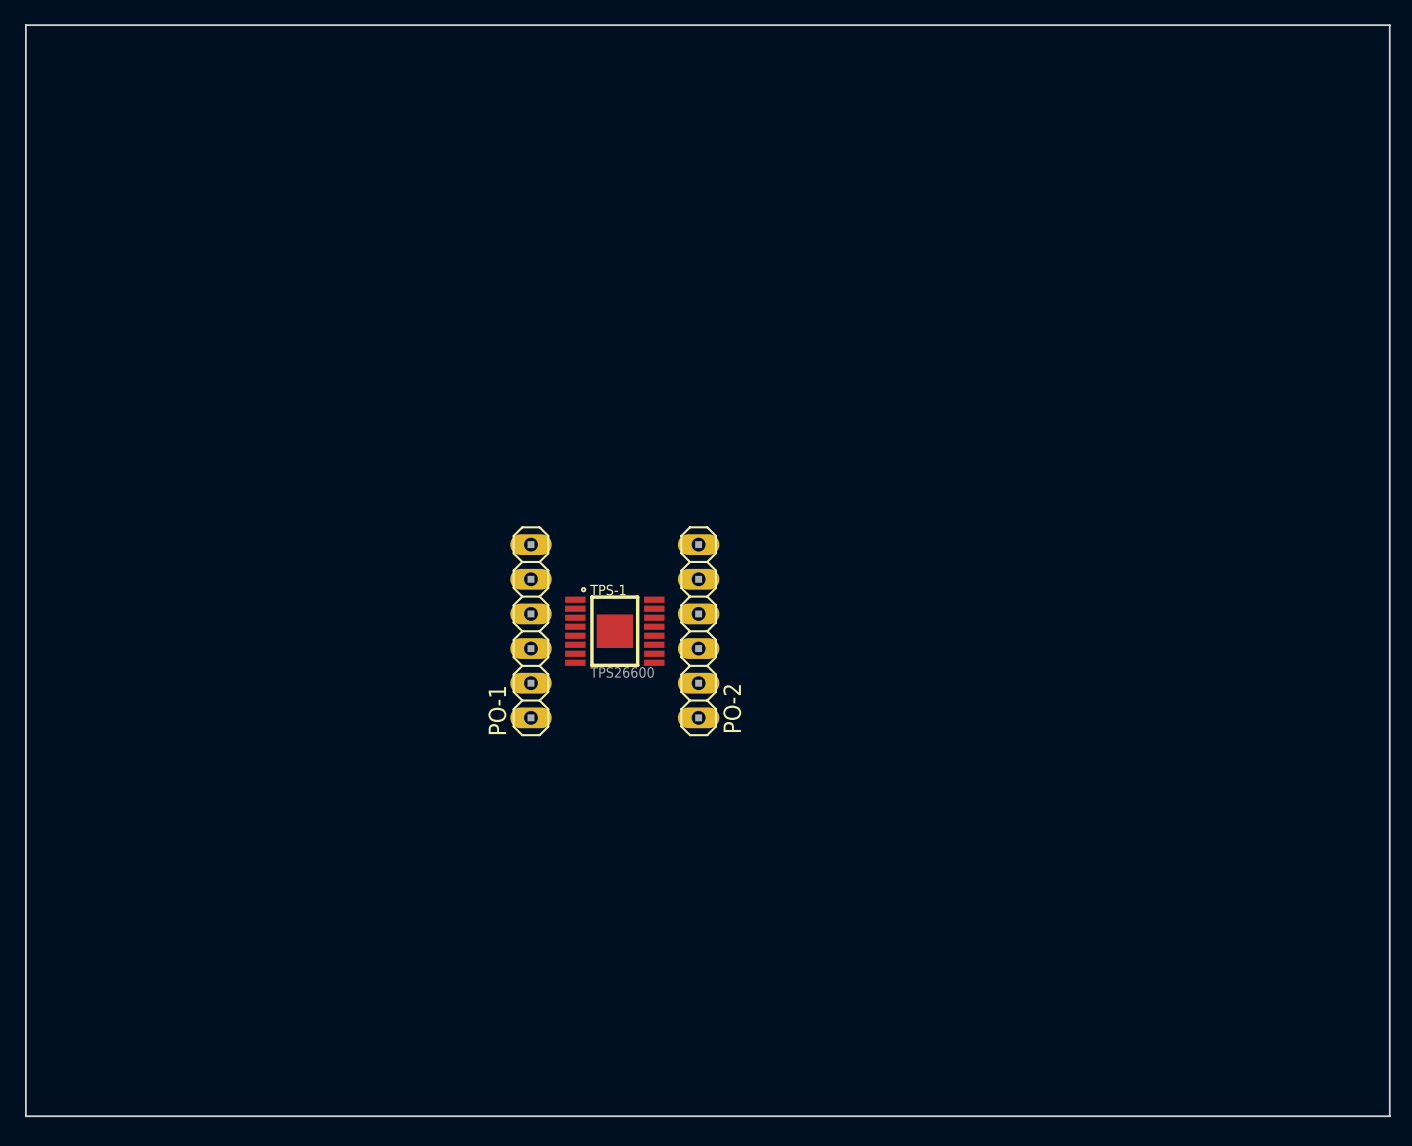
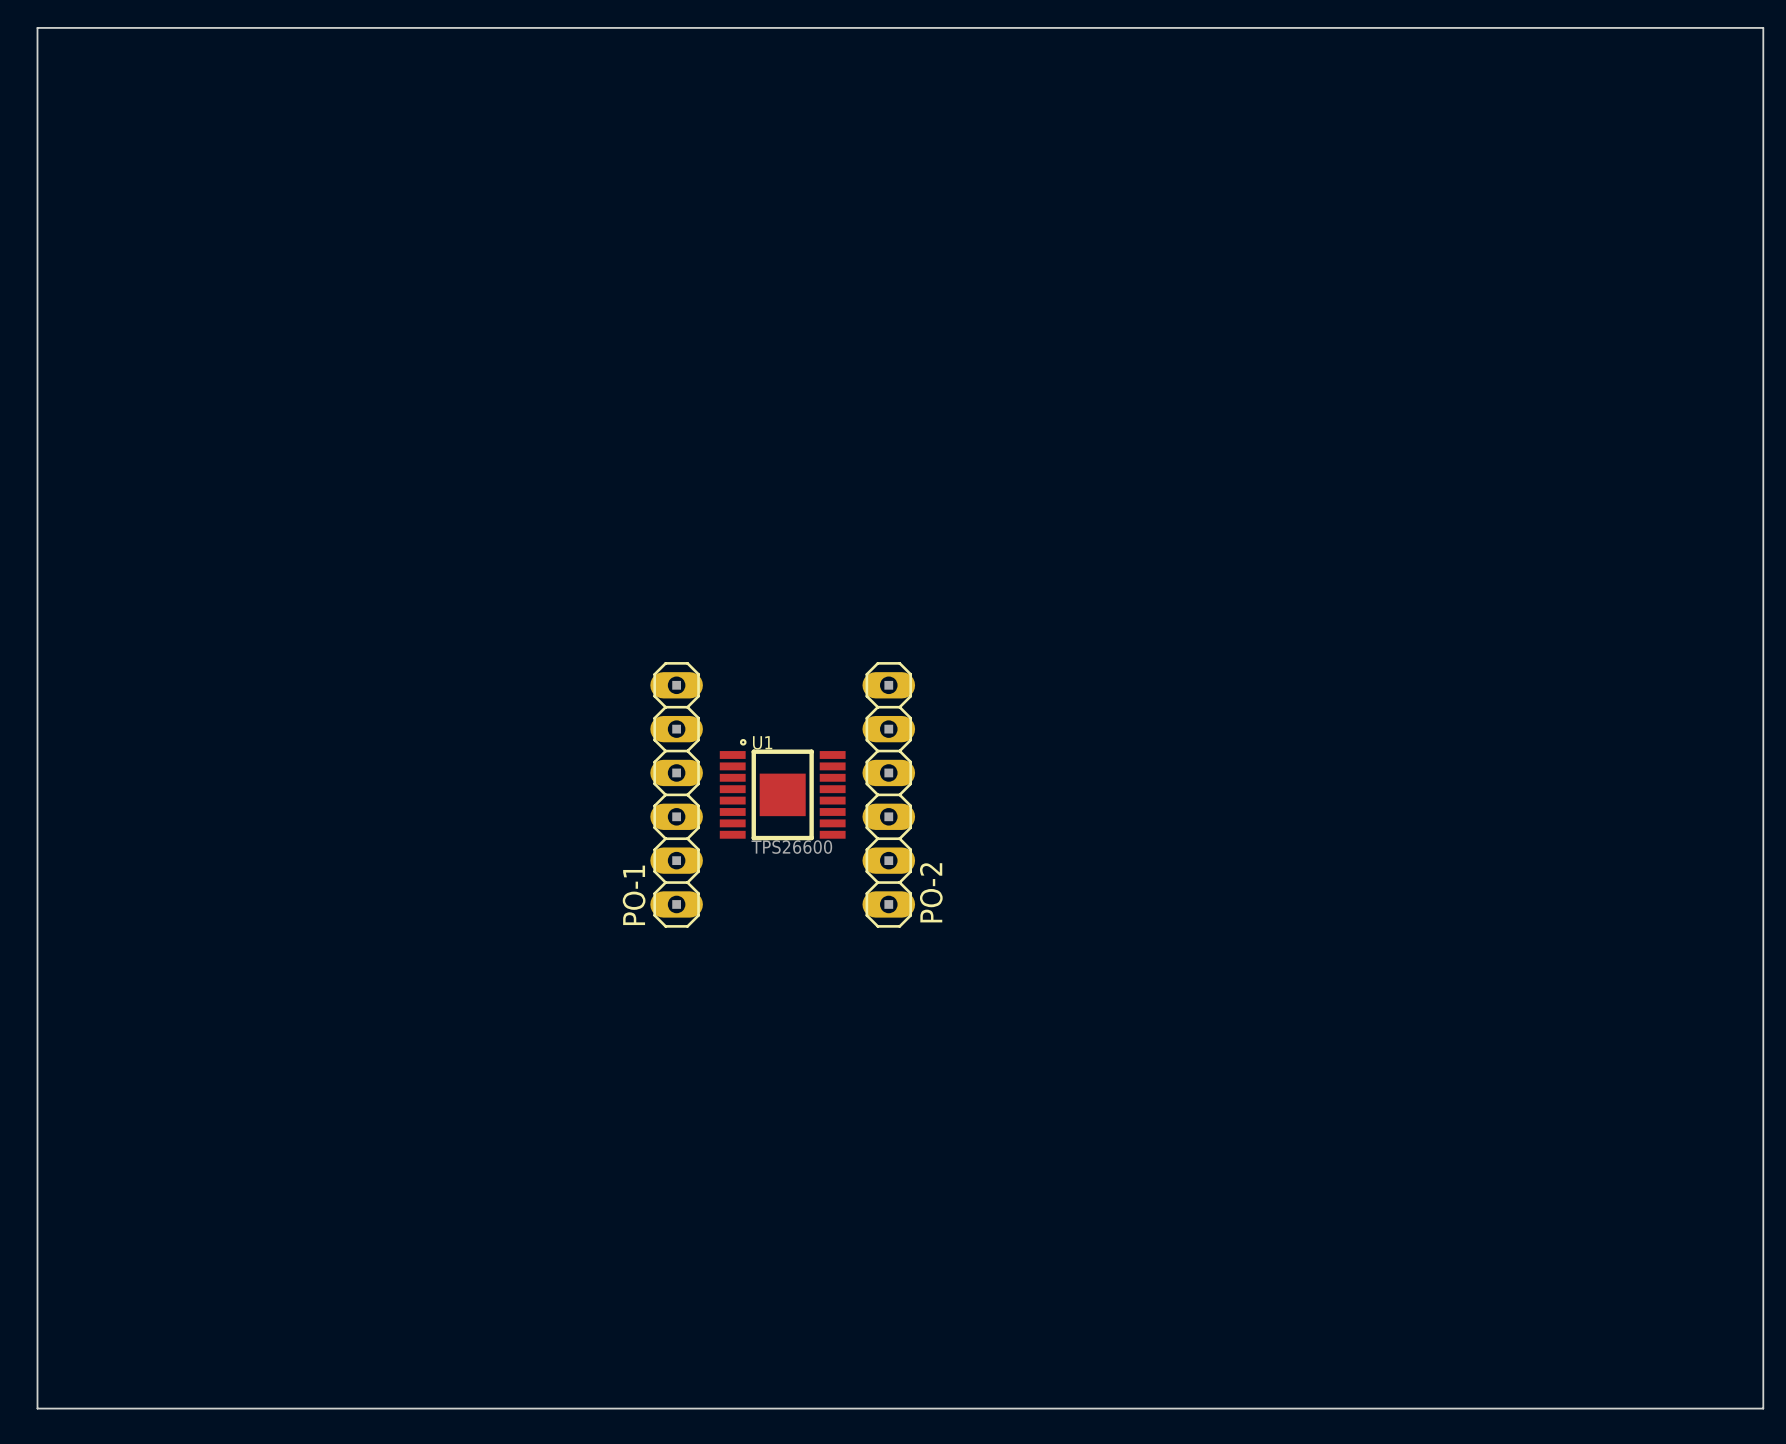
TPS-1 name: TPS-1 (607, 590) -> U1 (762, 742)

